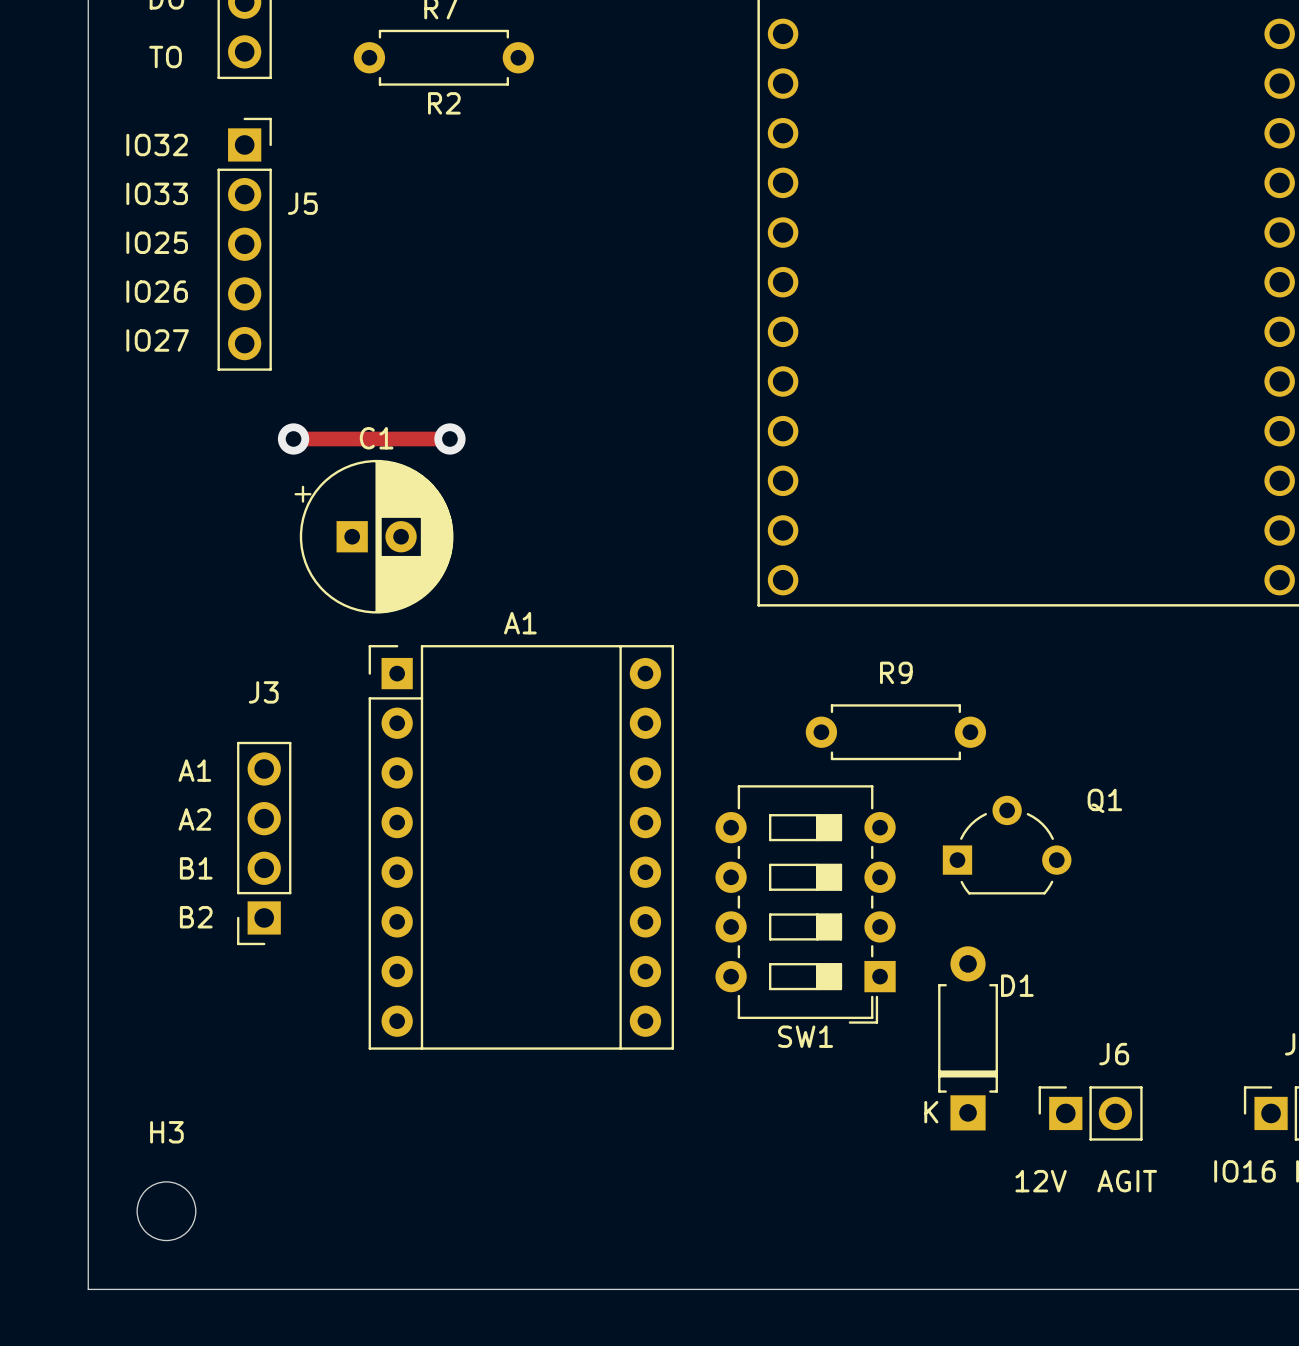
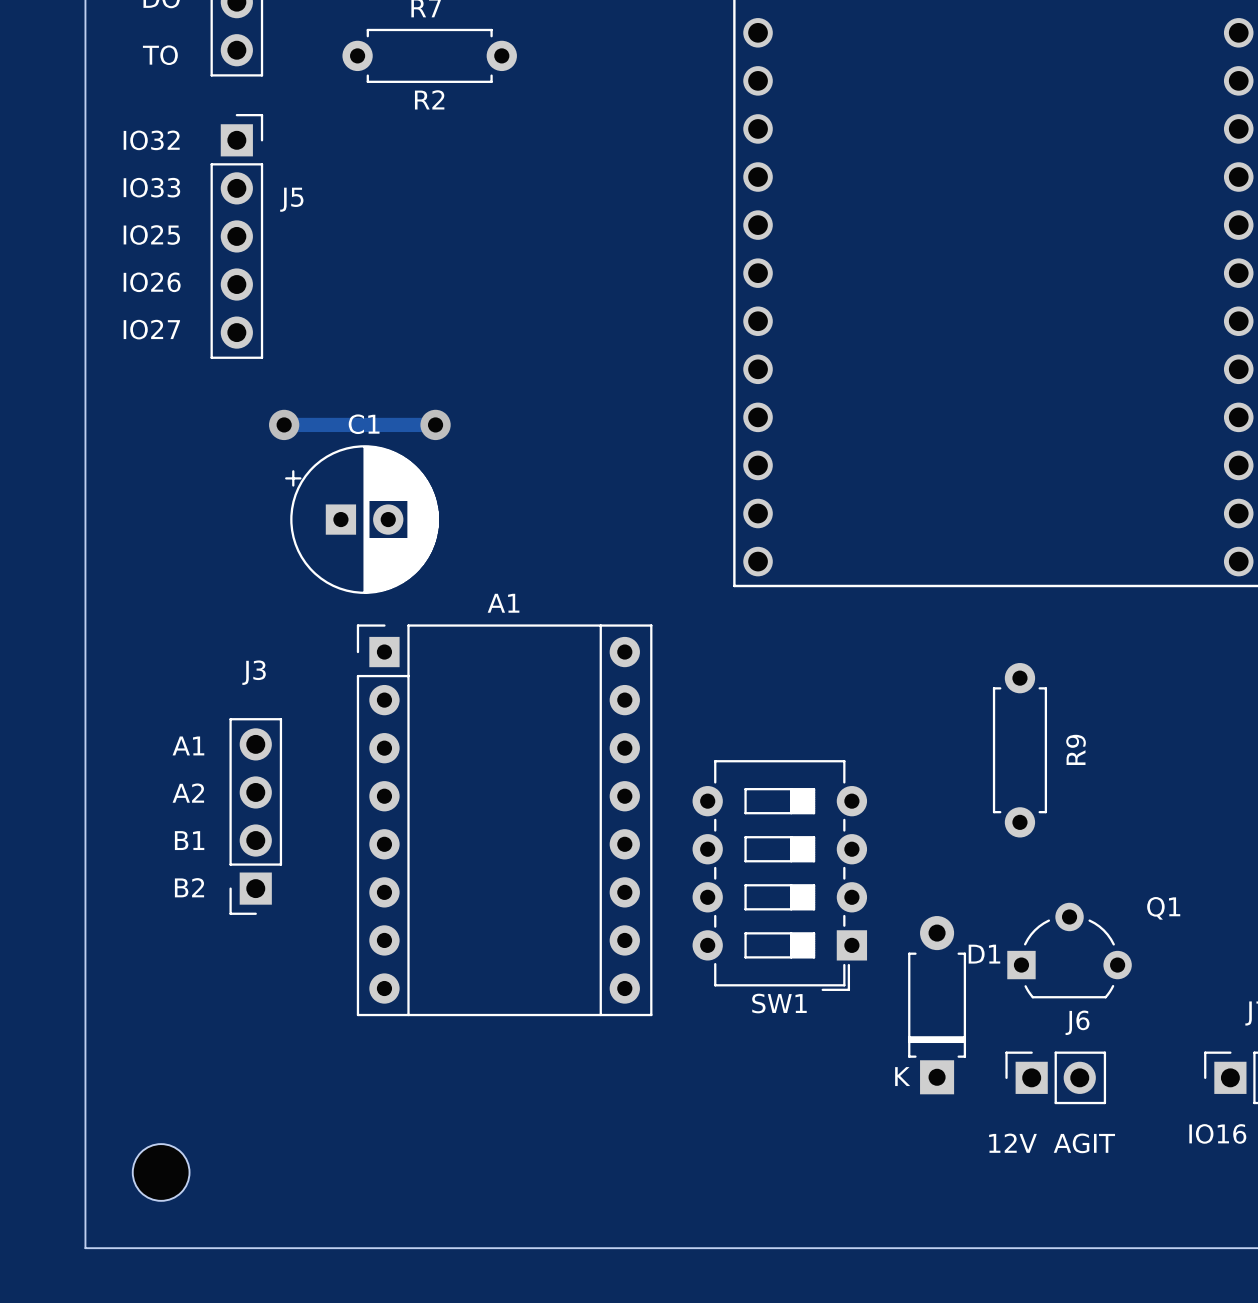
R9 rotation: 0° (895, 732) -> 90° clockwise (1019, 750)
R9 position: (895, 732) -> (1019, 750)
Q1 position: (1007, 845) -> (1069, 950)
H3 name: H3 (166, 1132) -> none

